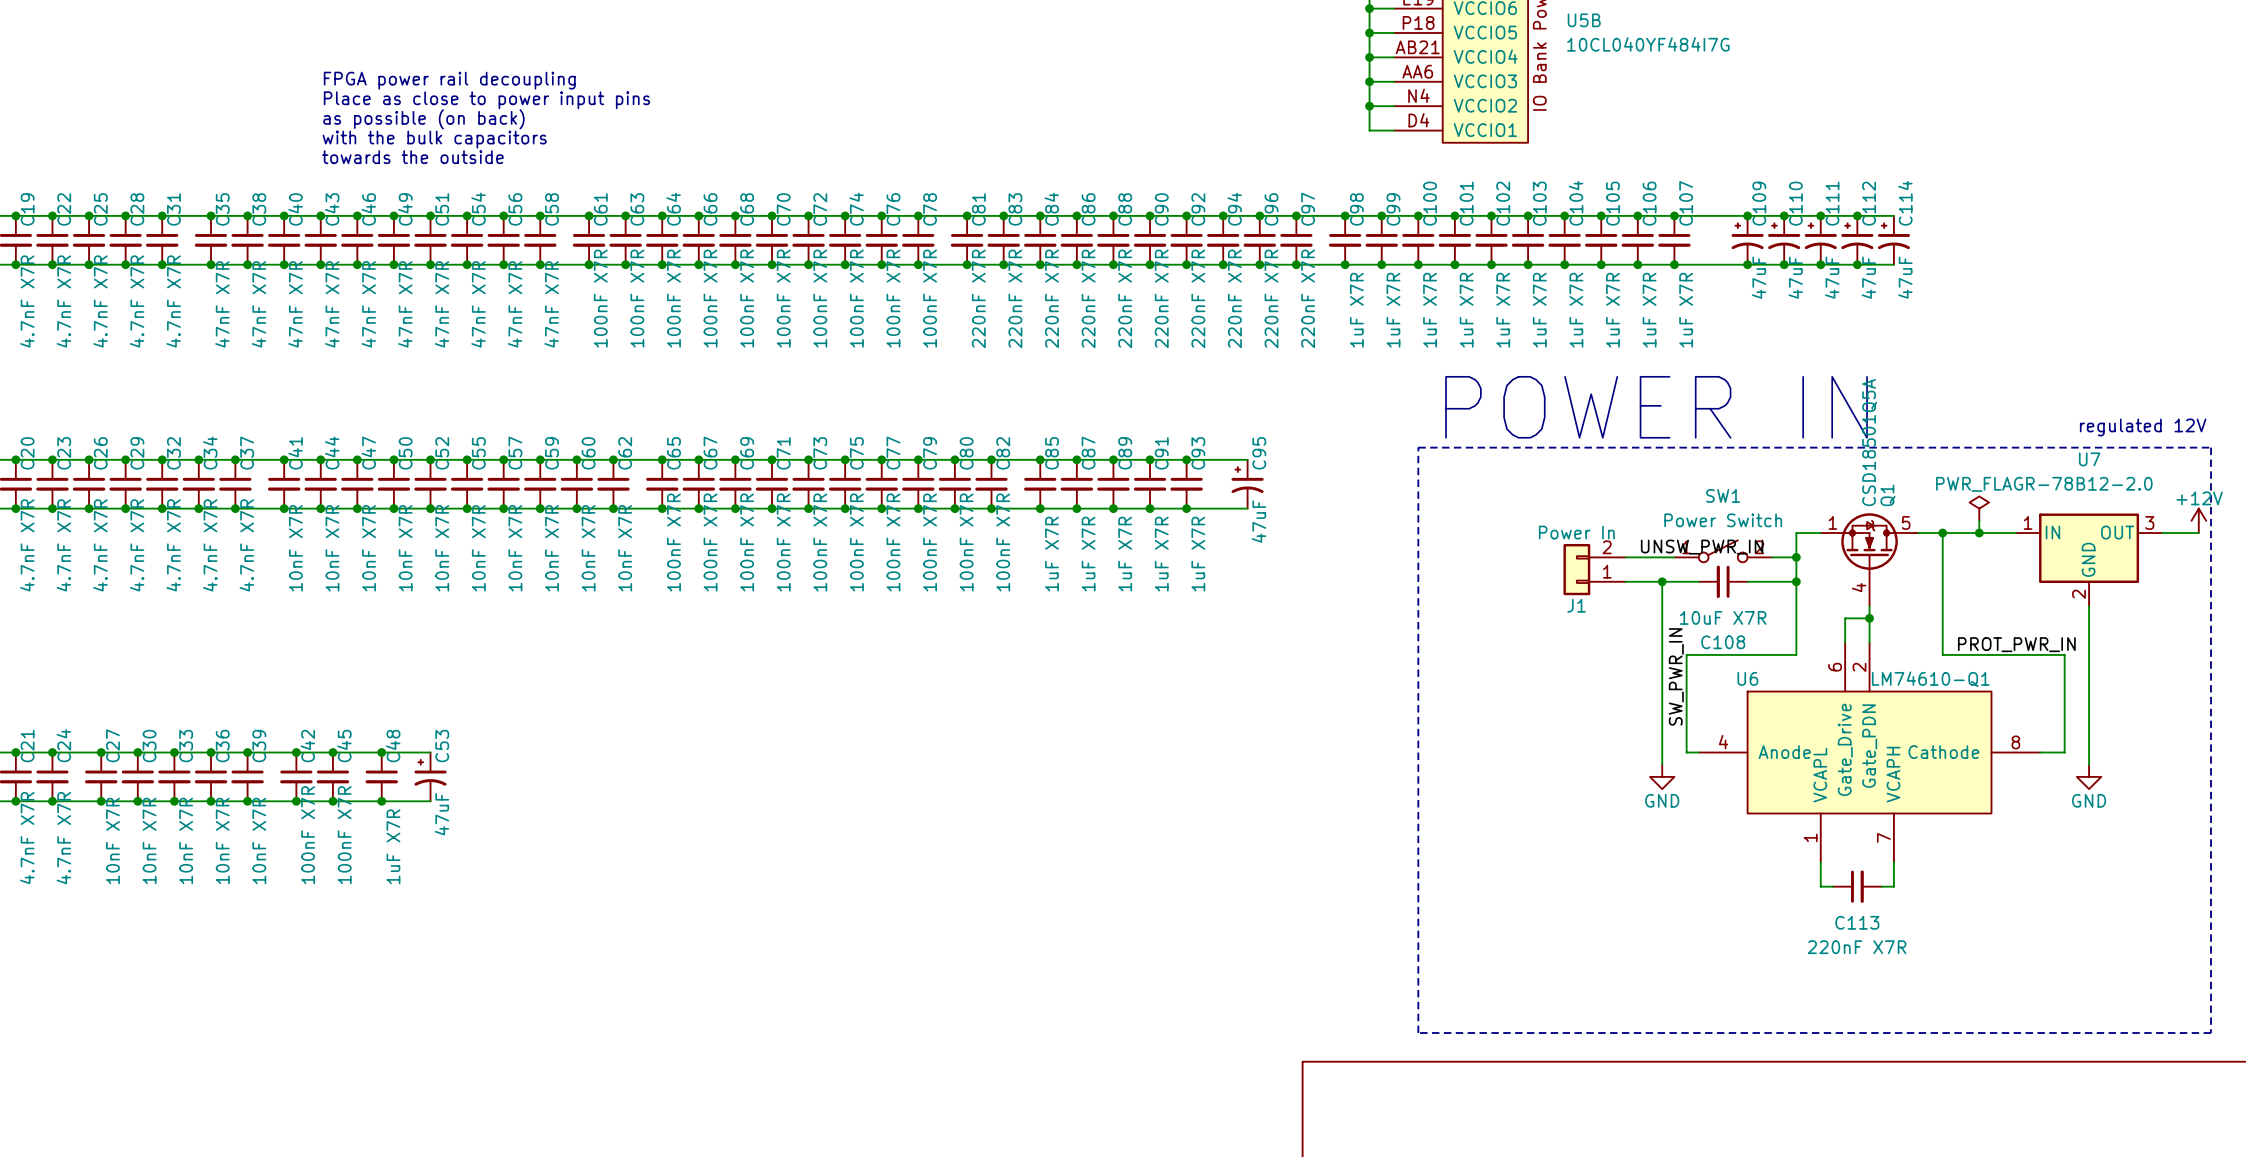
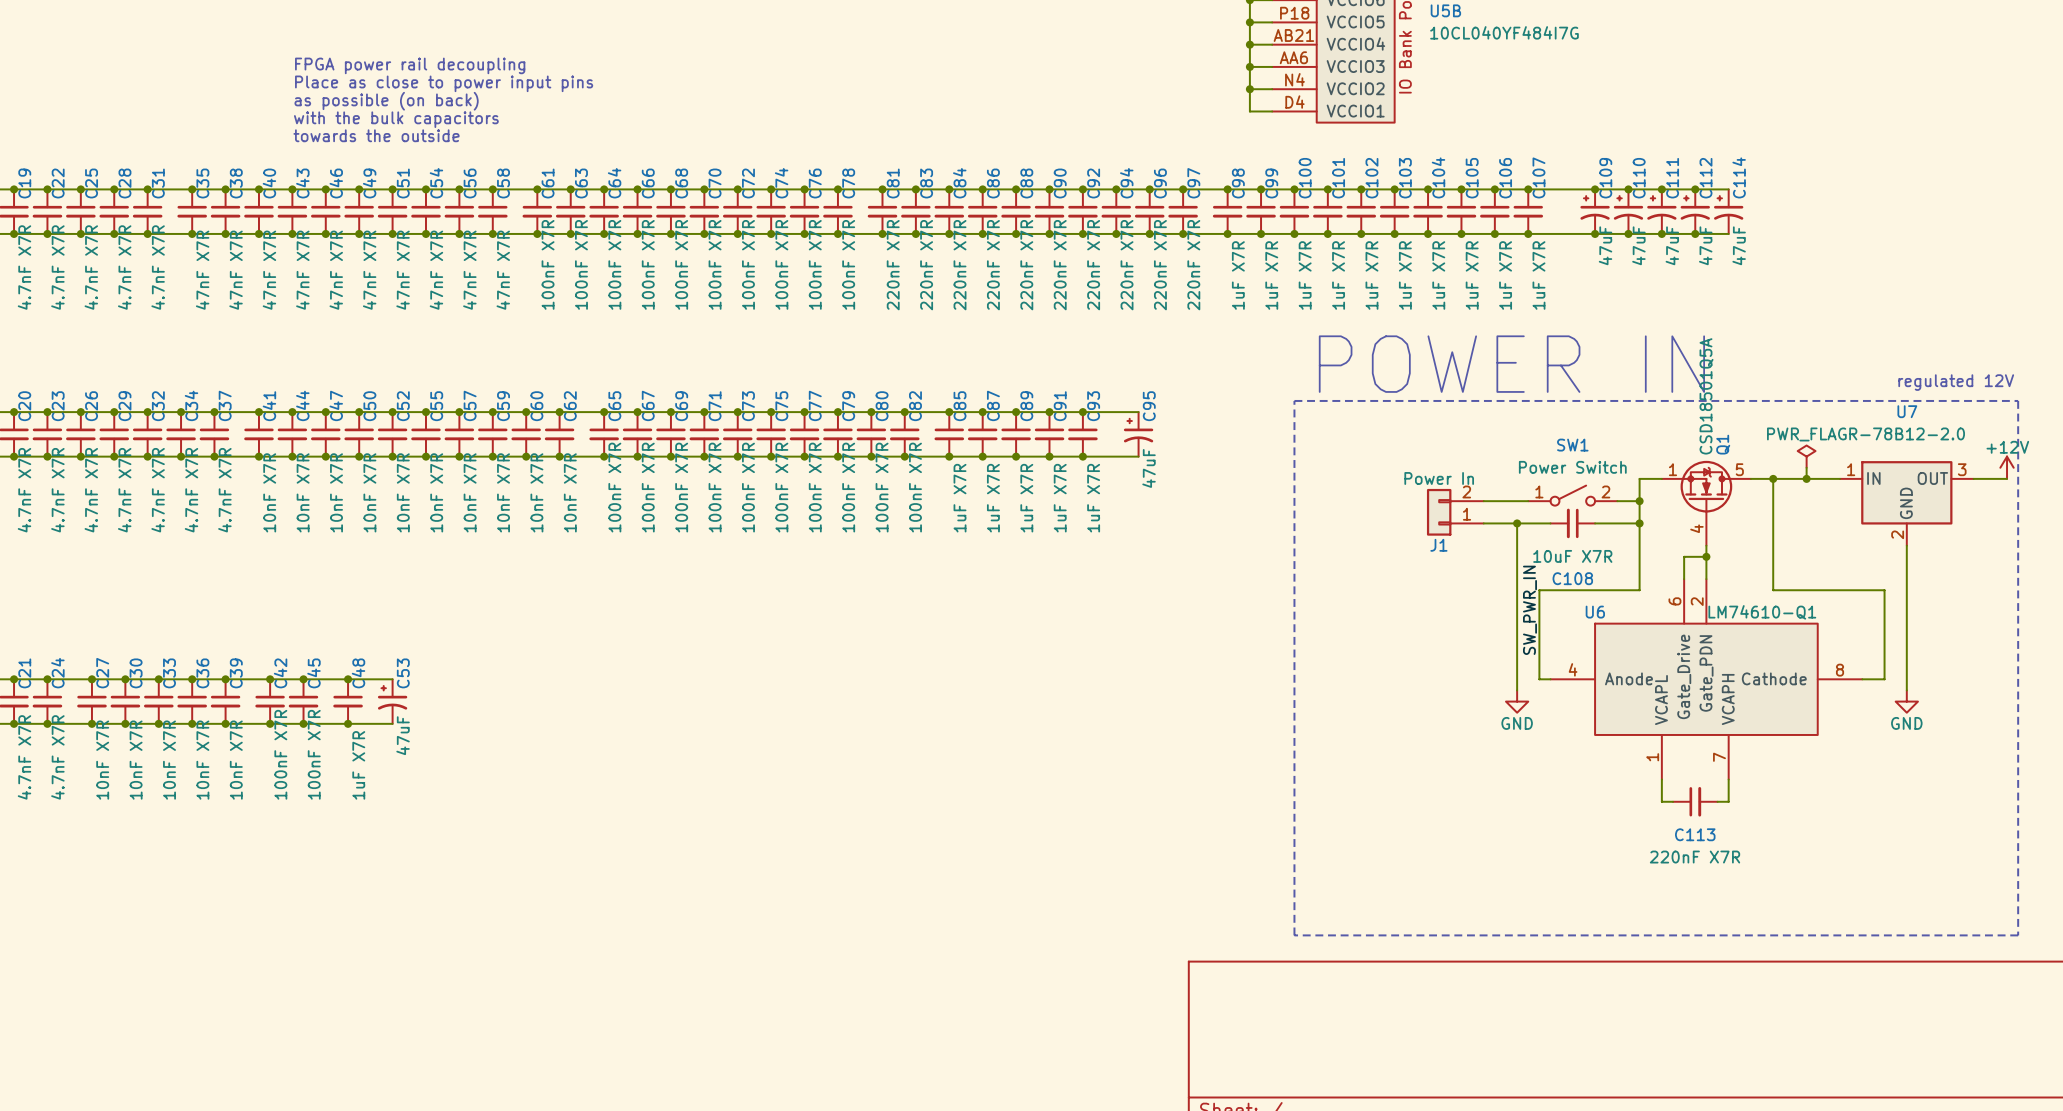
label: UNSW_PWR_IN (1702, 547) -> none
label: PROT_PWR_IN (2016, 644) -> none

